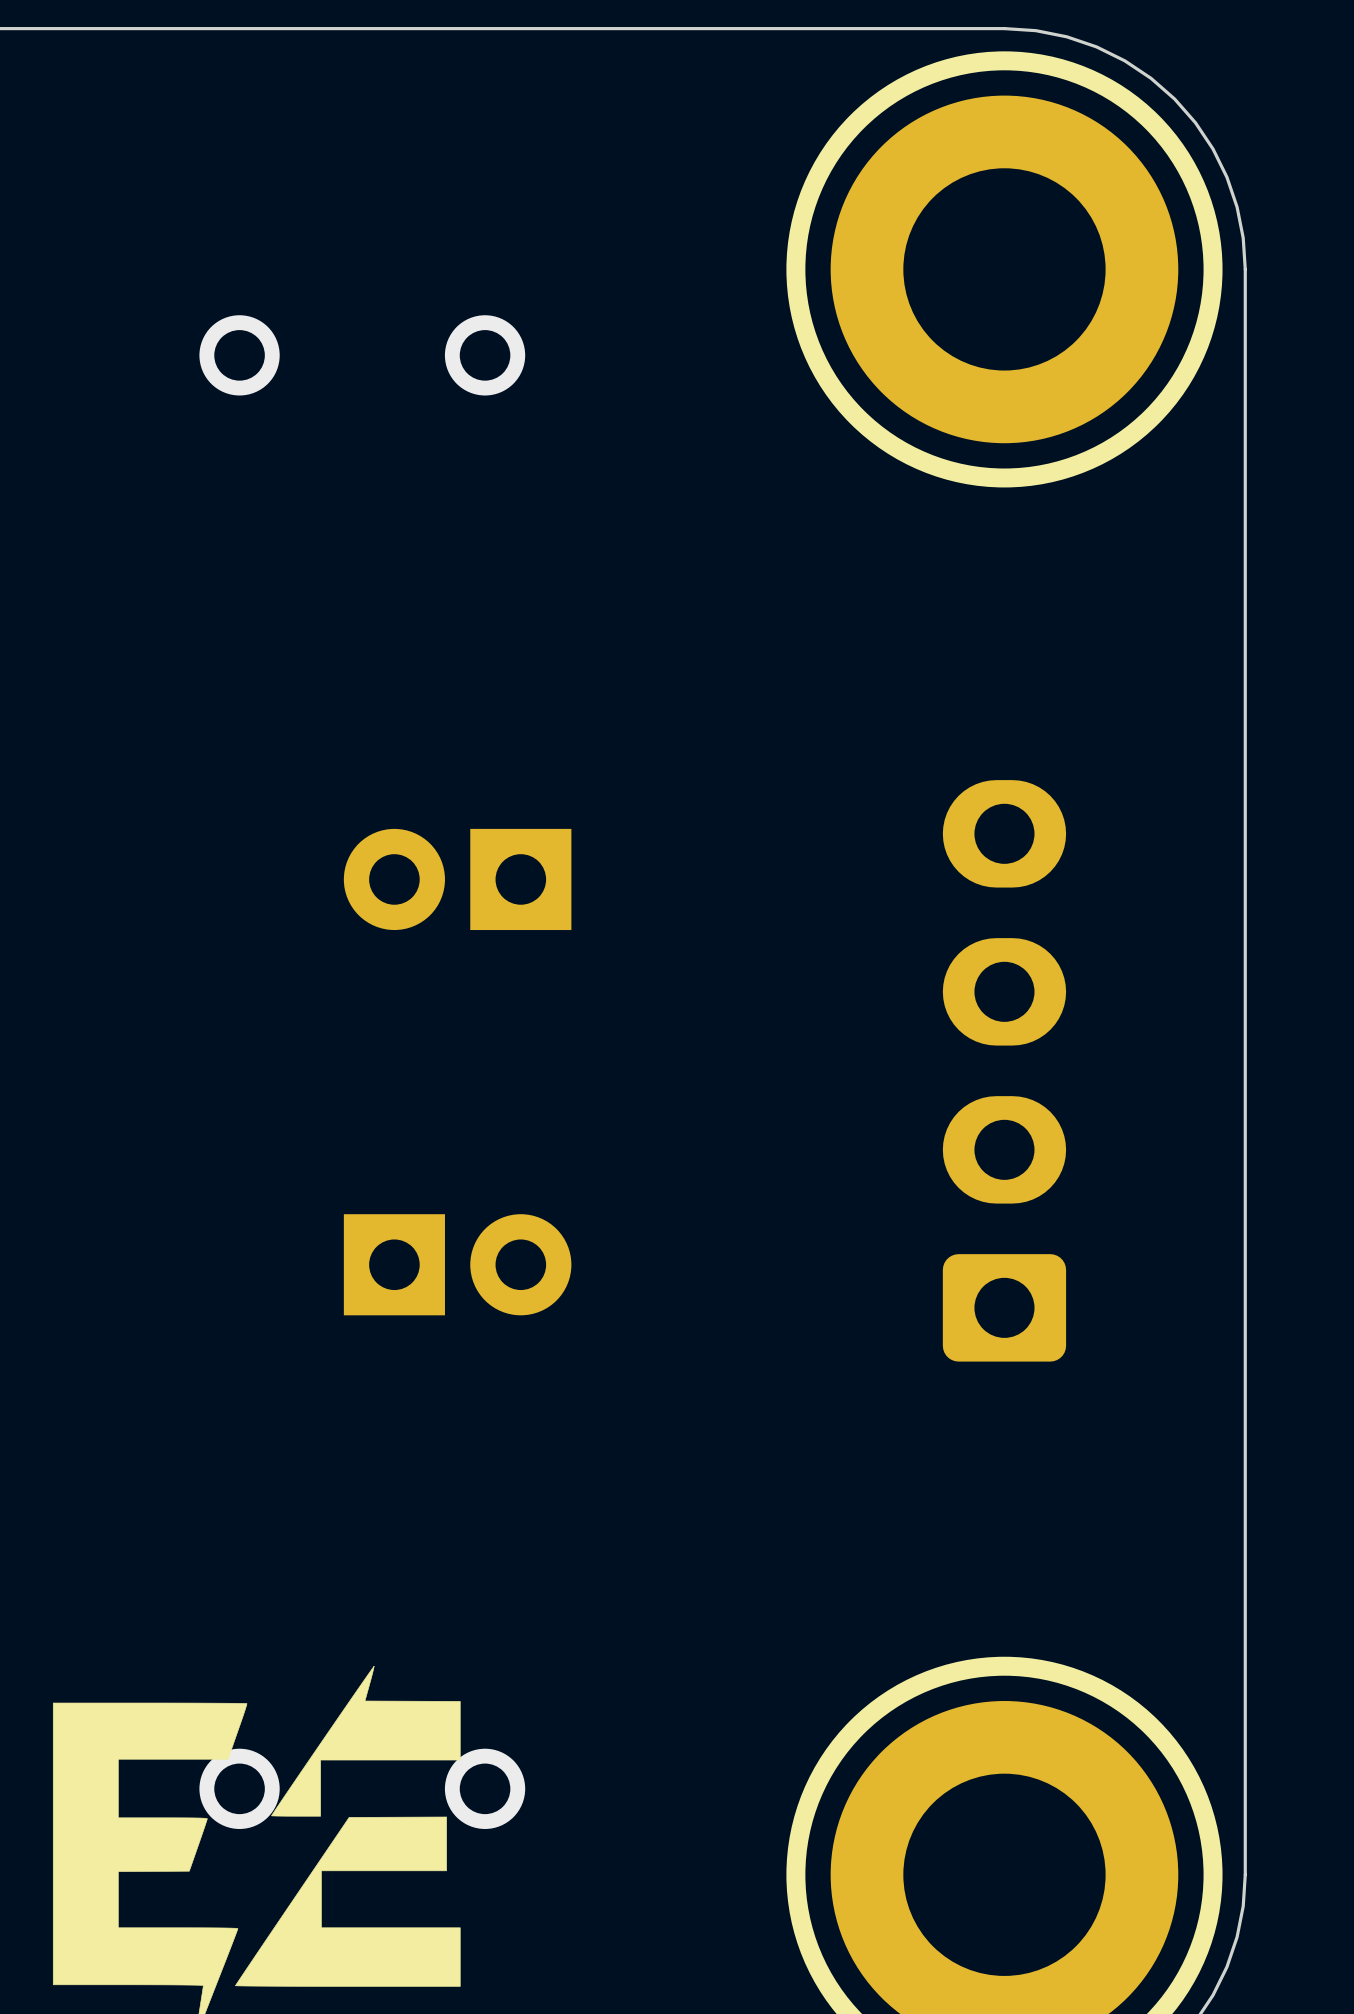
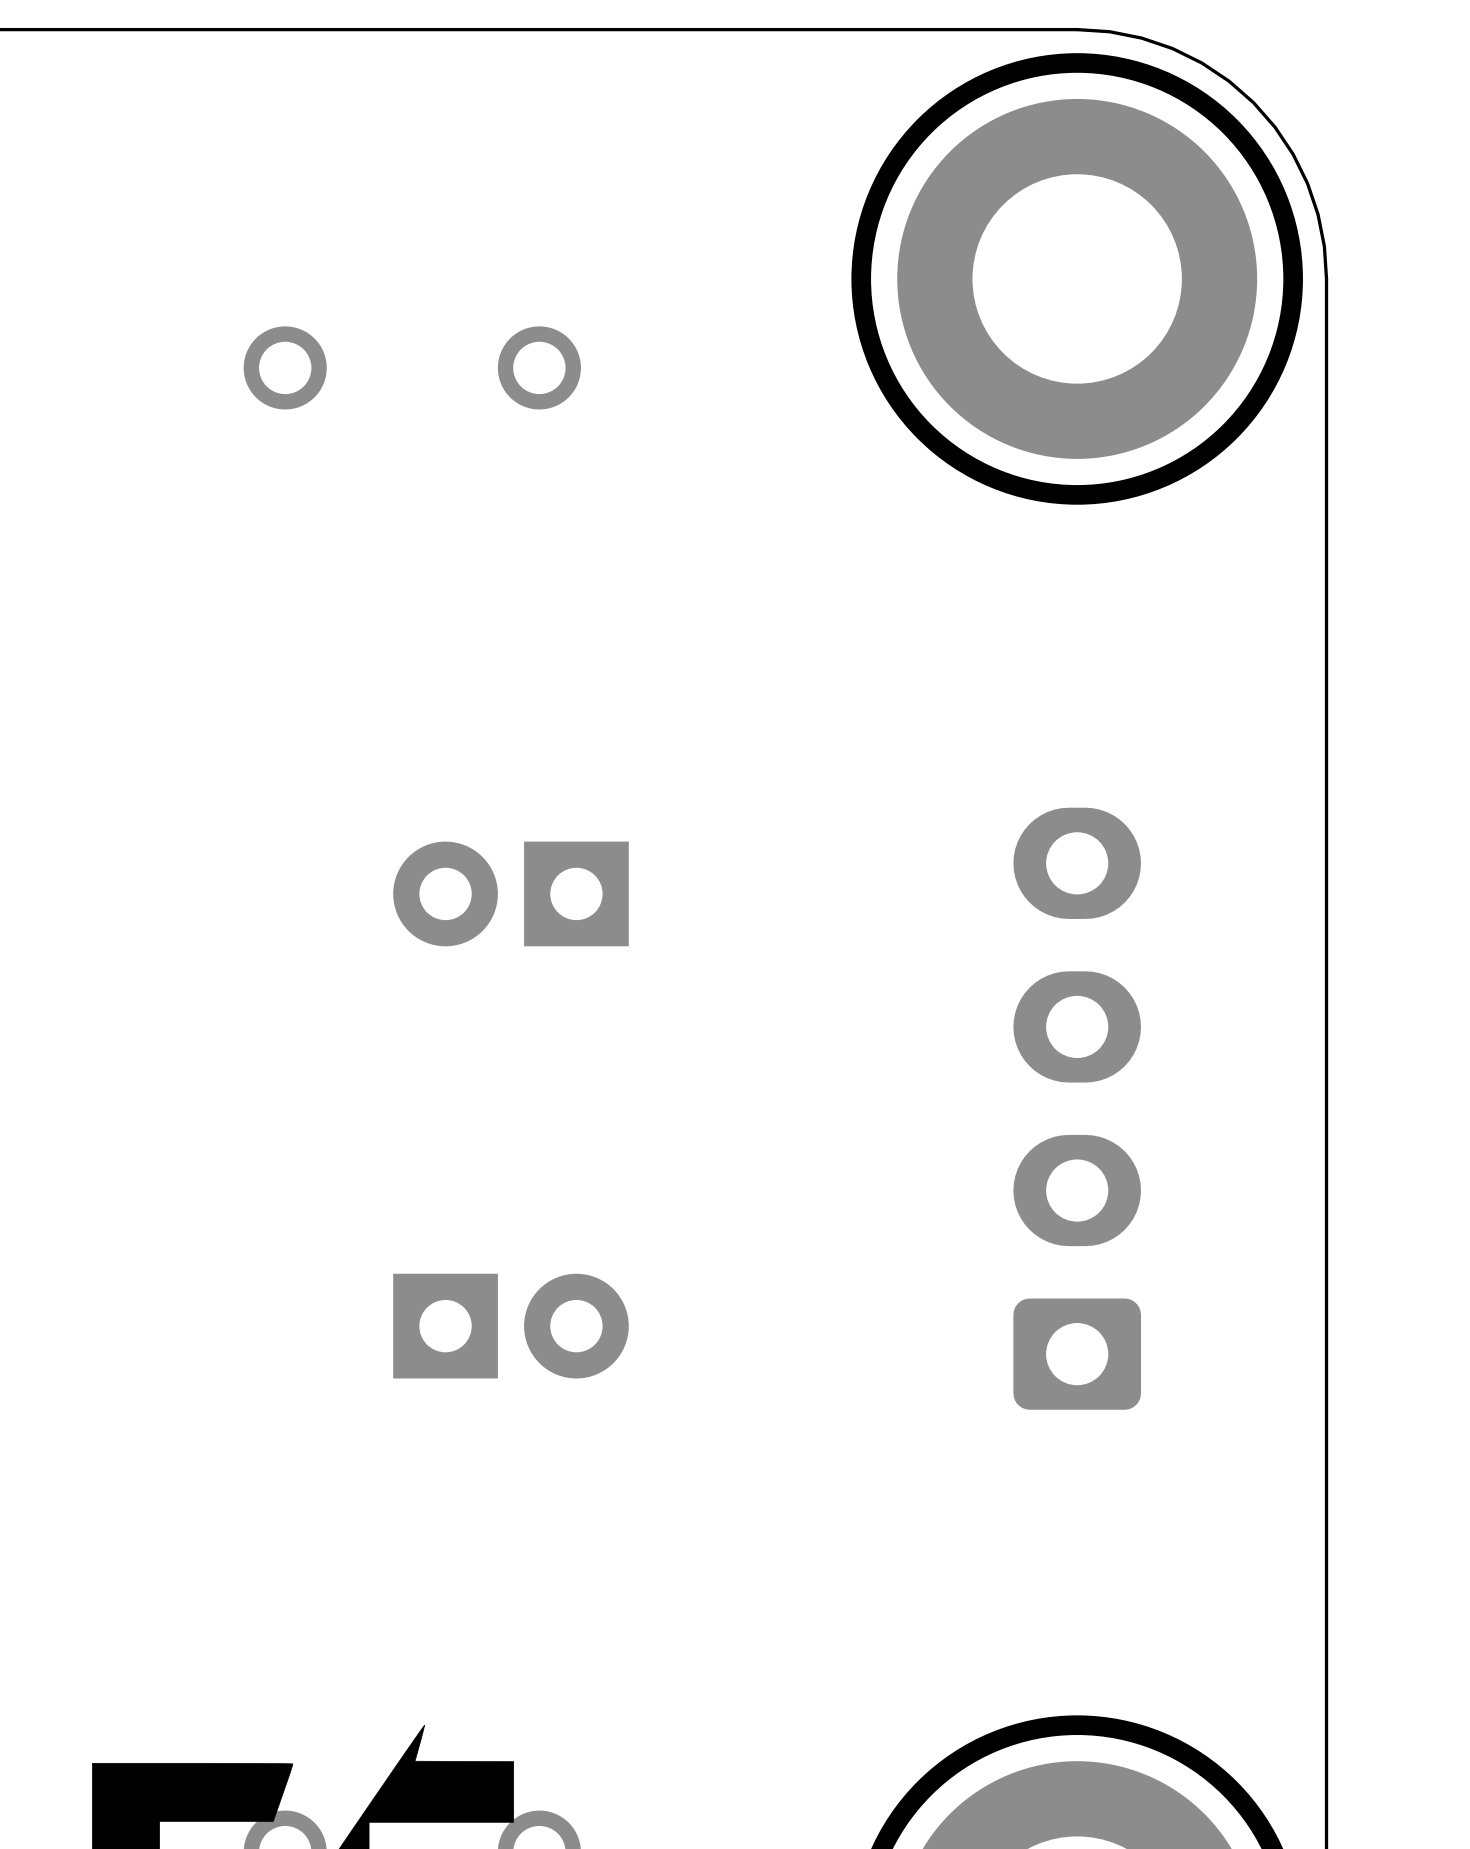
part position: (457, 879) -> (510, 893)
part position: (457, 1264) -> (510, 1326)

